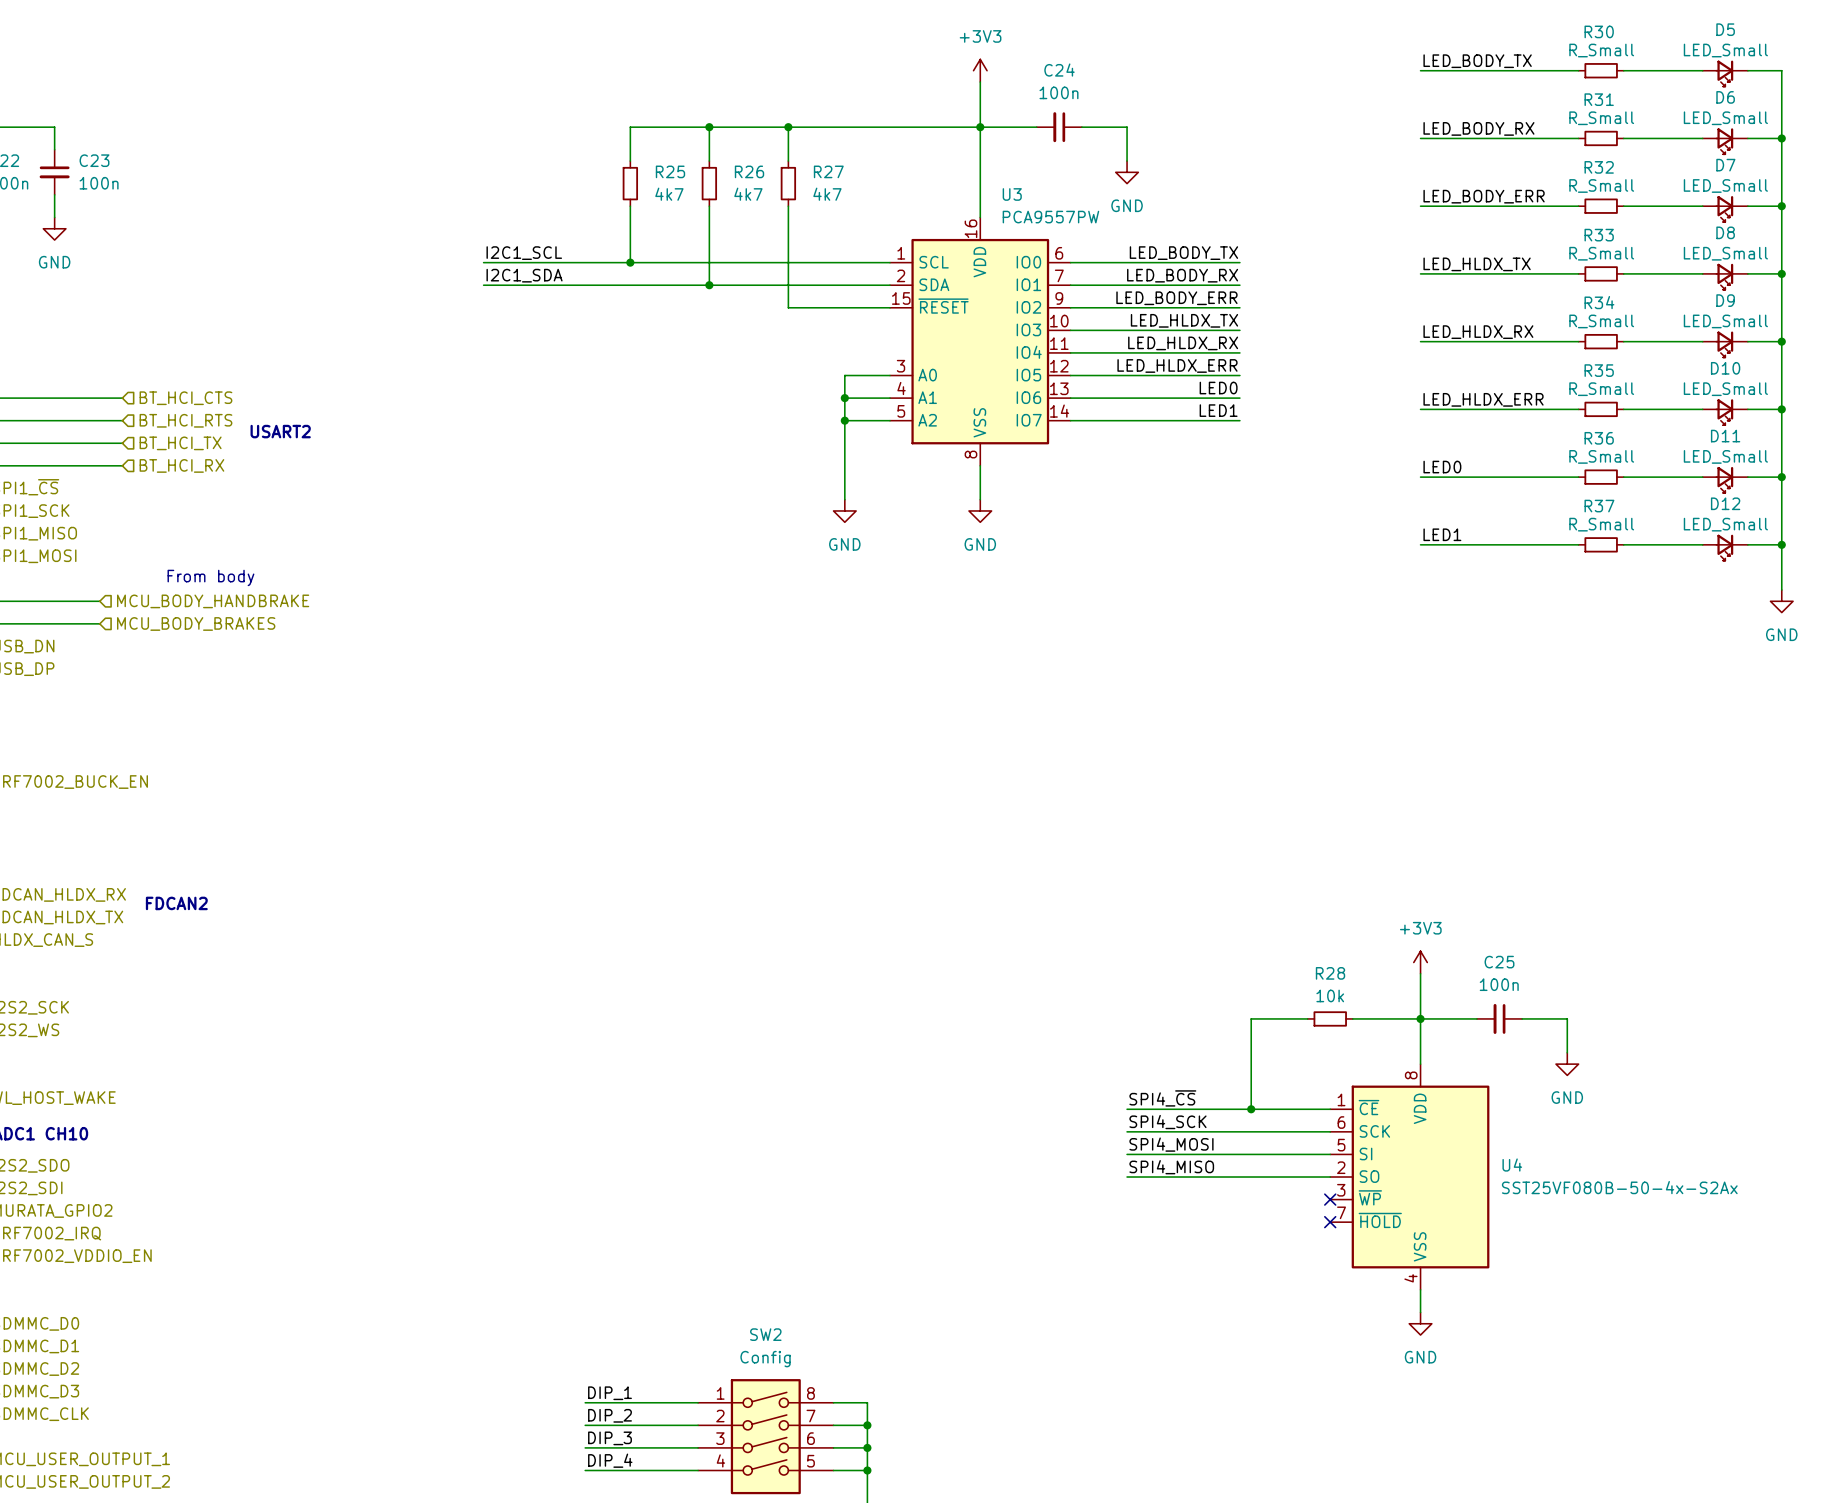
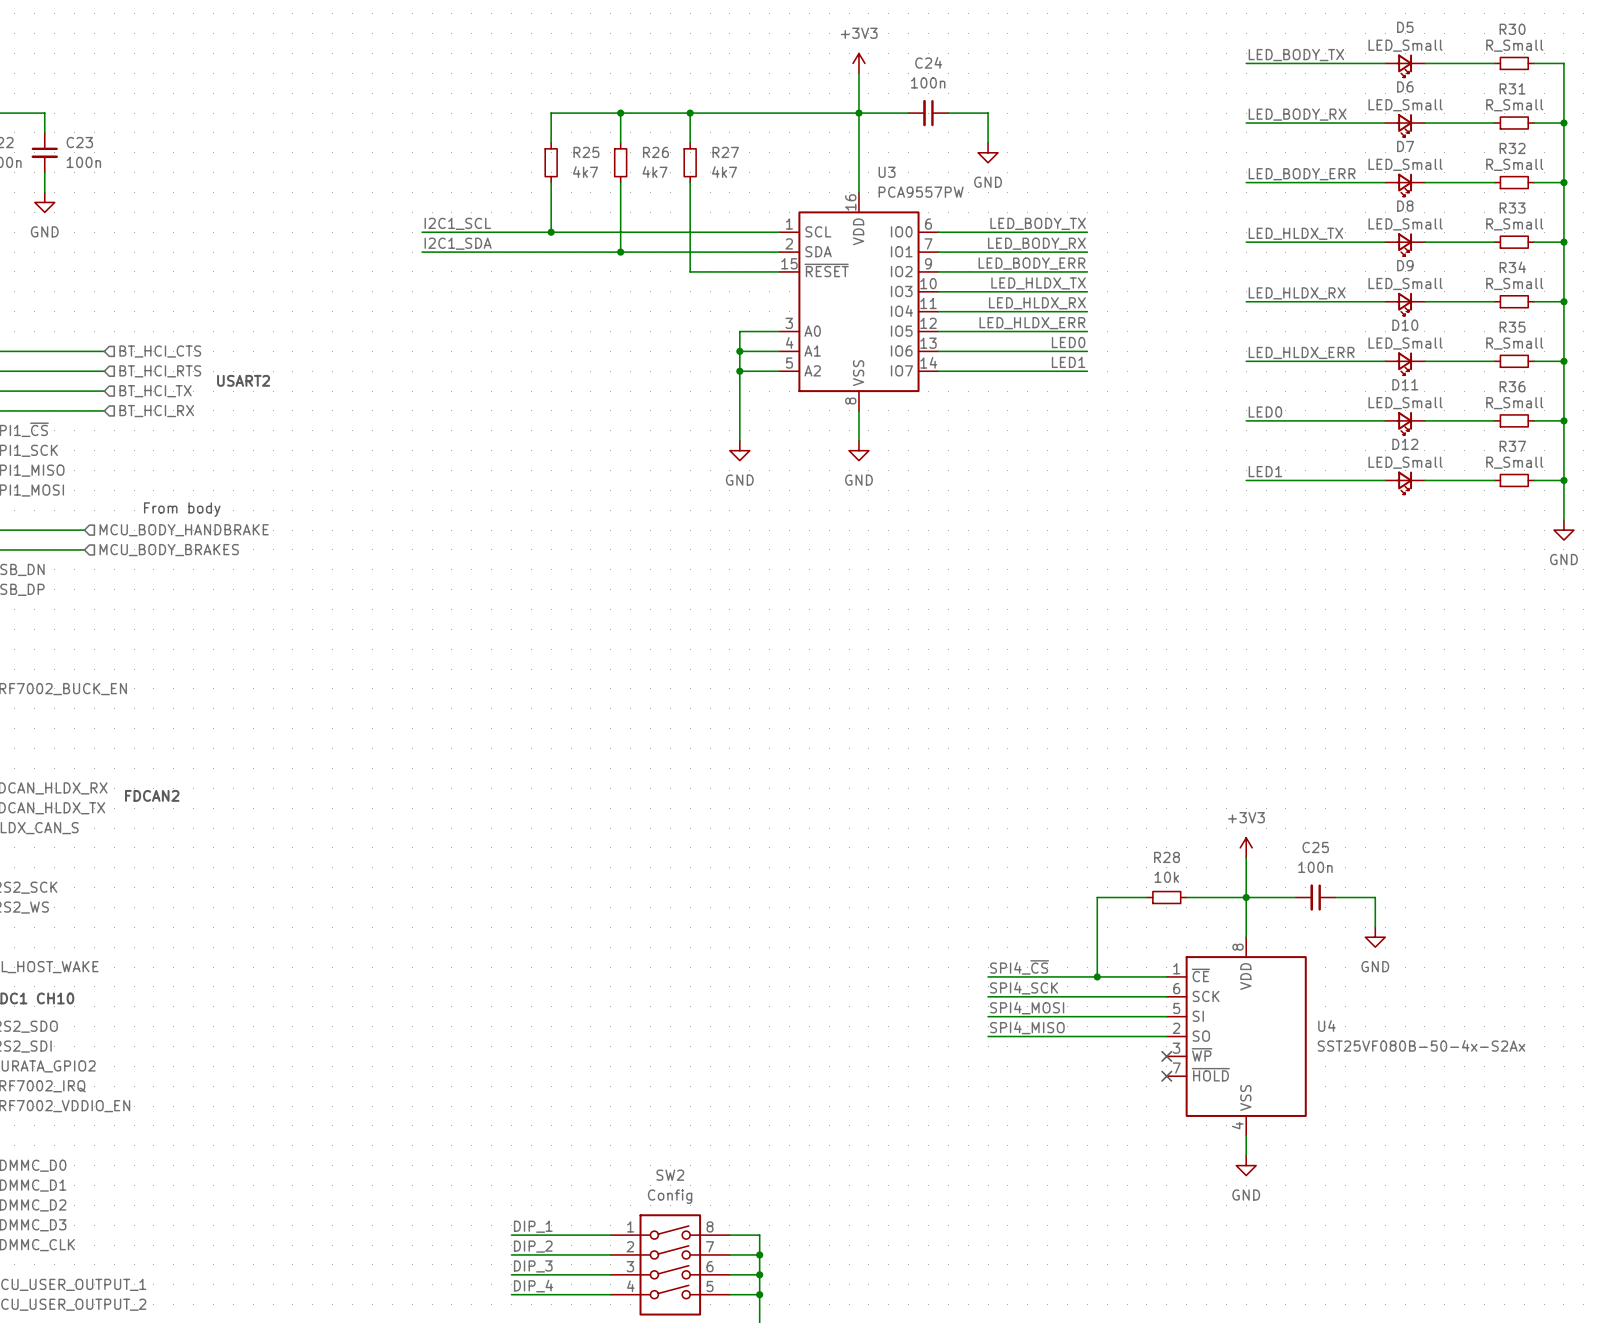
R30 position: (1601, 70) -> (1514, 63)
D5 position: (1725, 73) -> (1405, 65)
R31 position: (1601, 138) -> (1514, 123)
D6 position: (1725, 141) -> (1405, 125)
R32 position: (1601, 206) -> (1514, 182)
D7 position: (1725, 209) -> (1405, 185)
R33 position: (1601, 273) -> (1514, 242)
D8 position: (1725, 276) -> (1405, 244)
R34 position: (1601, 341) -> (1514, 301)
D9 position: (1725, 344) -> (1405, 304)
R35 position: (1601, 409) -> (1514, 361)
D10 position: (1725, 412) -> (1405, 363)
R36 position: (1601, 477) -> (1514, 420)
D11 position: (1725, 479) -> (1405, 423)
R37 position: (1601, 544) -> (1514, 480)
D12 position: (1725, 547) -> (1405, 482)

